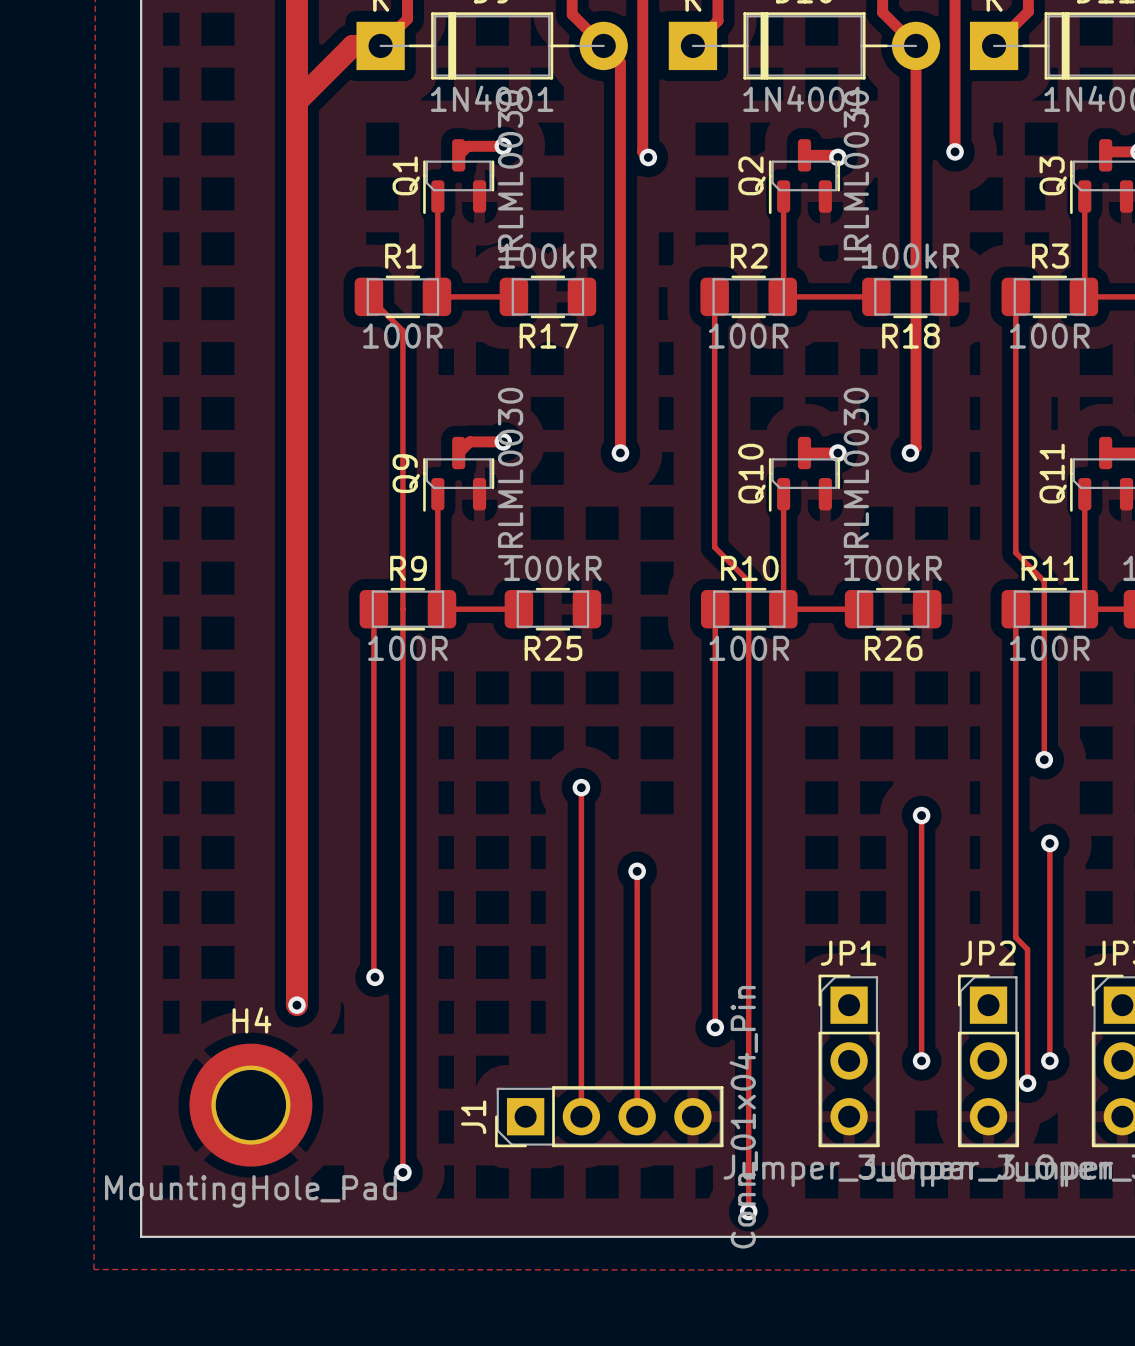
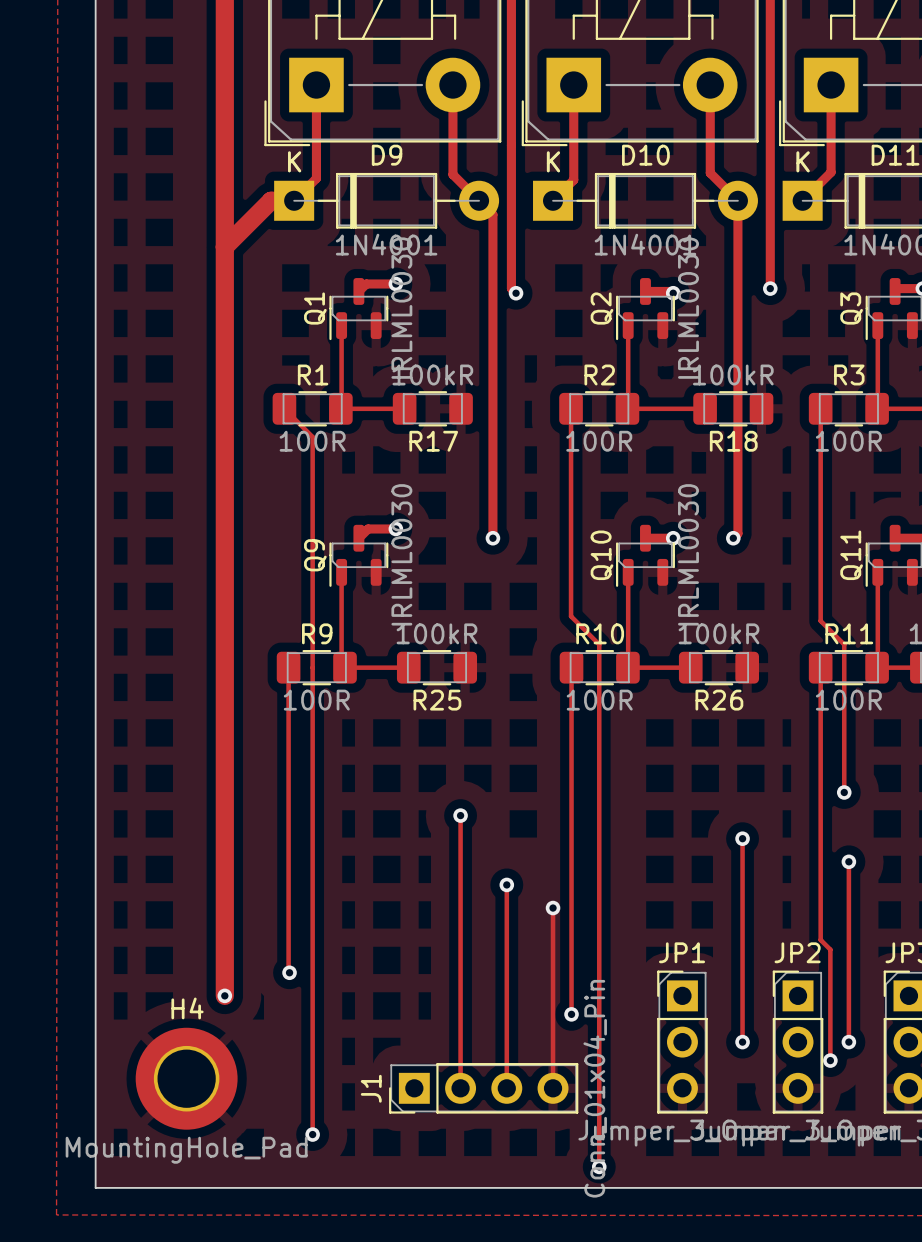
track: none -> (553, 908) (553, 1088)
via: none -> (553, 908)

